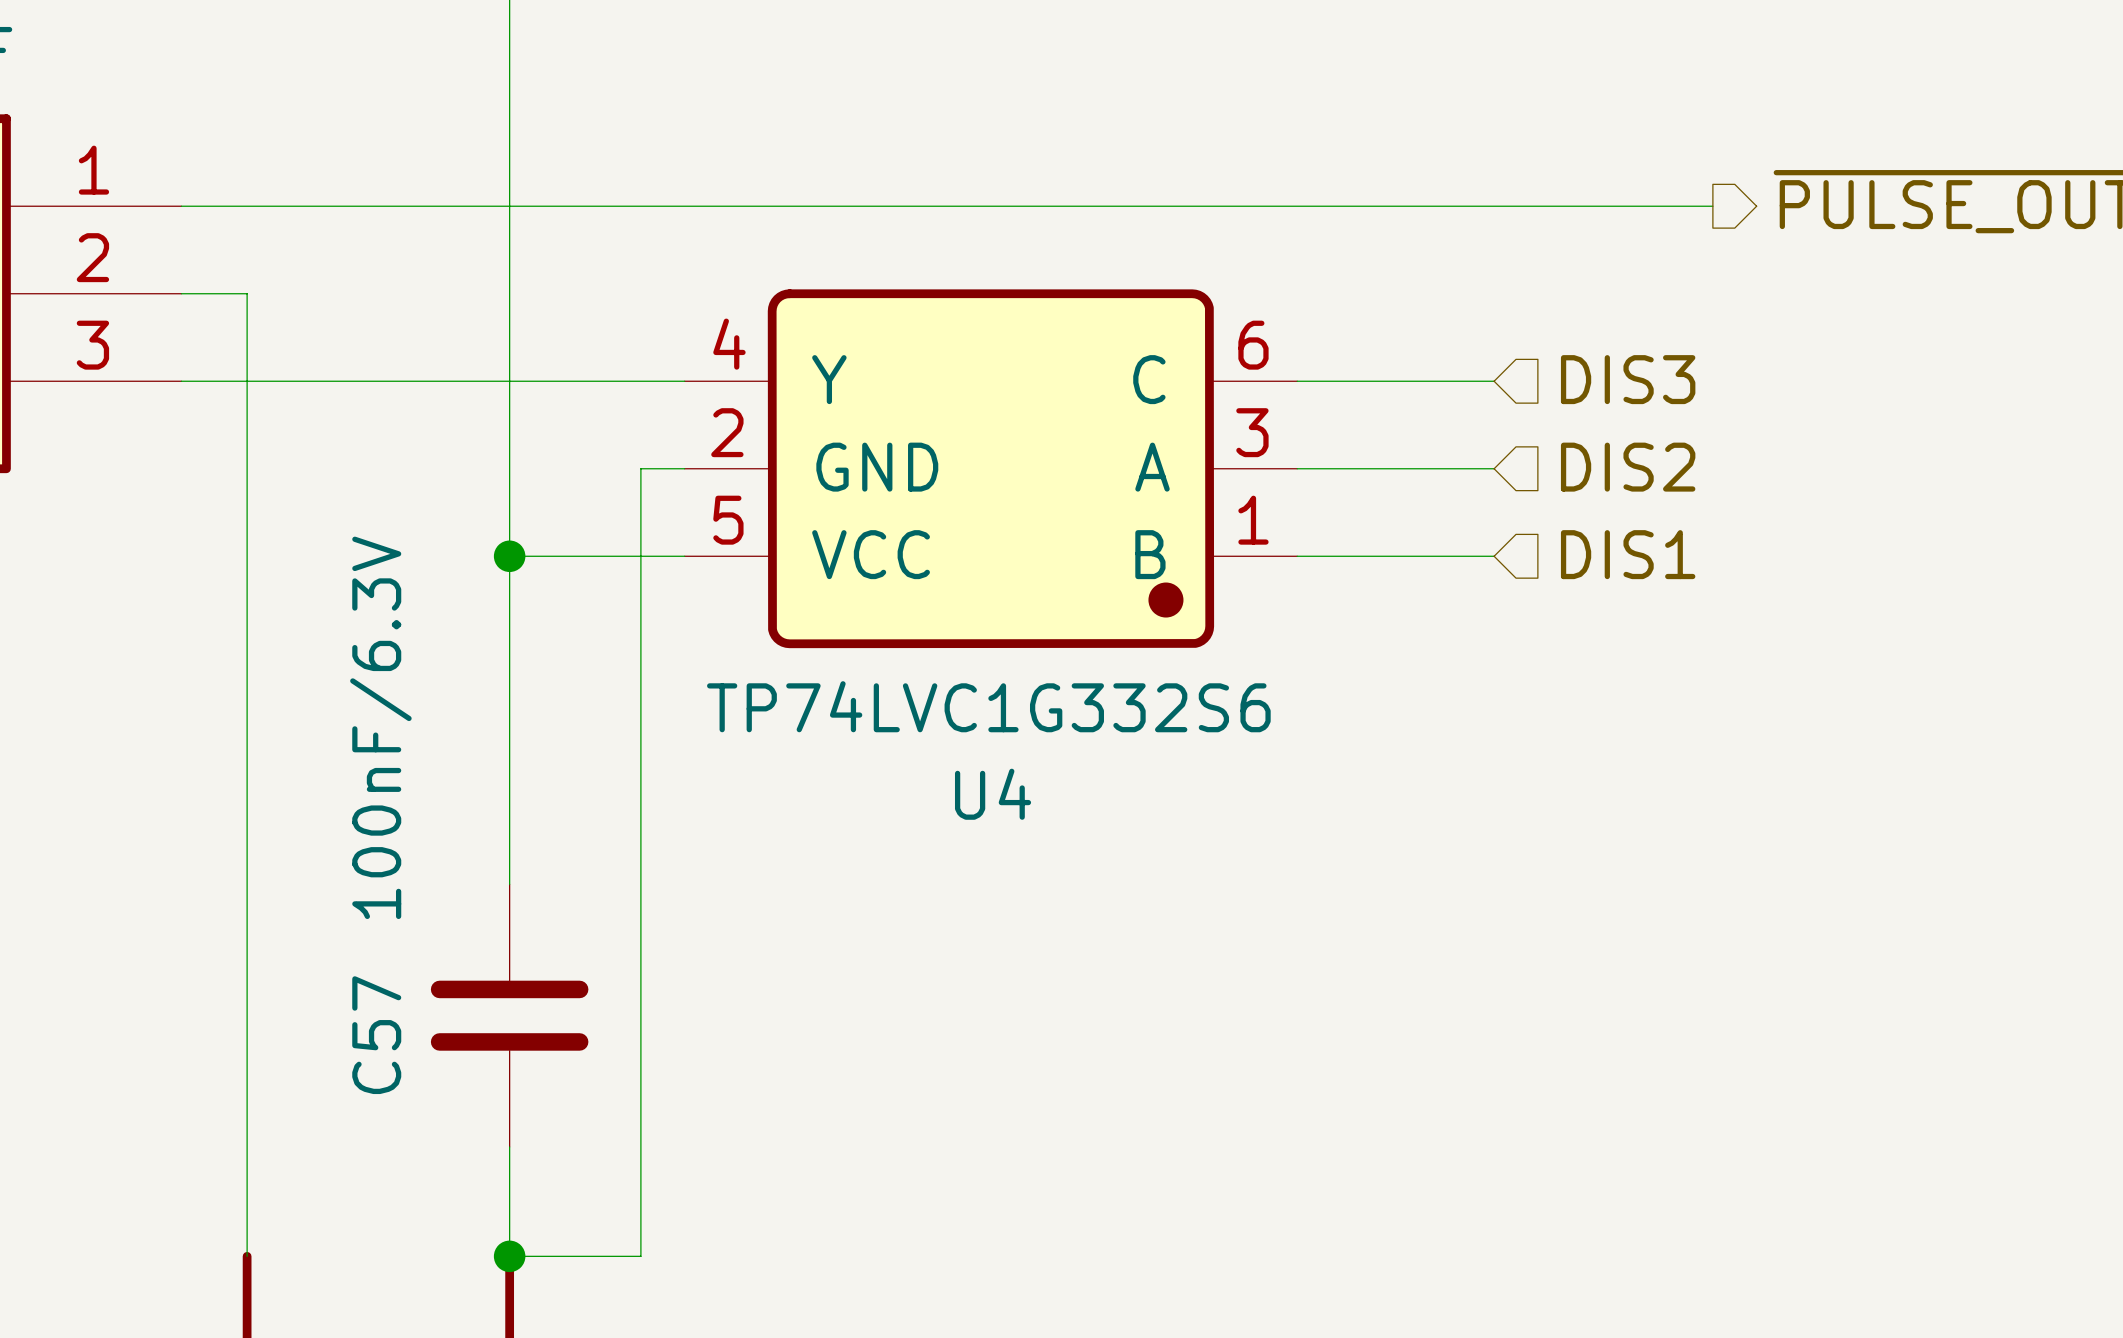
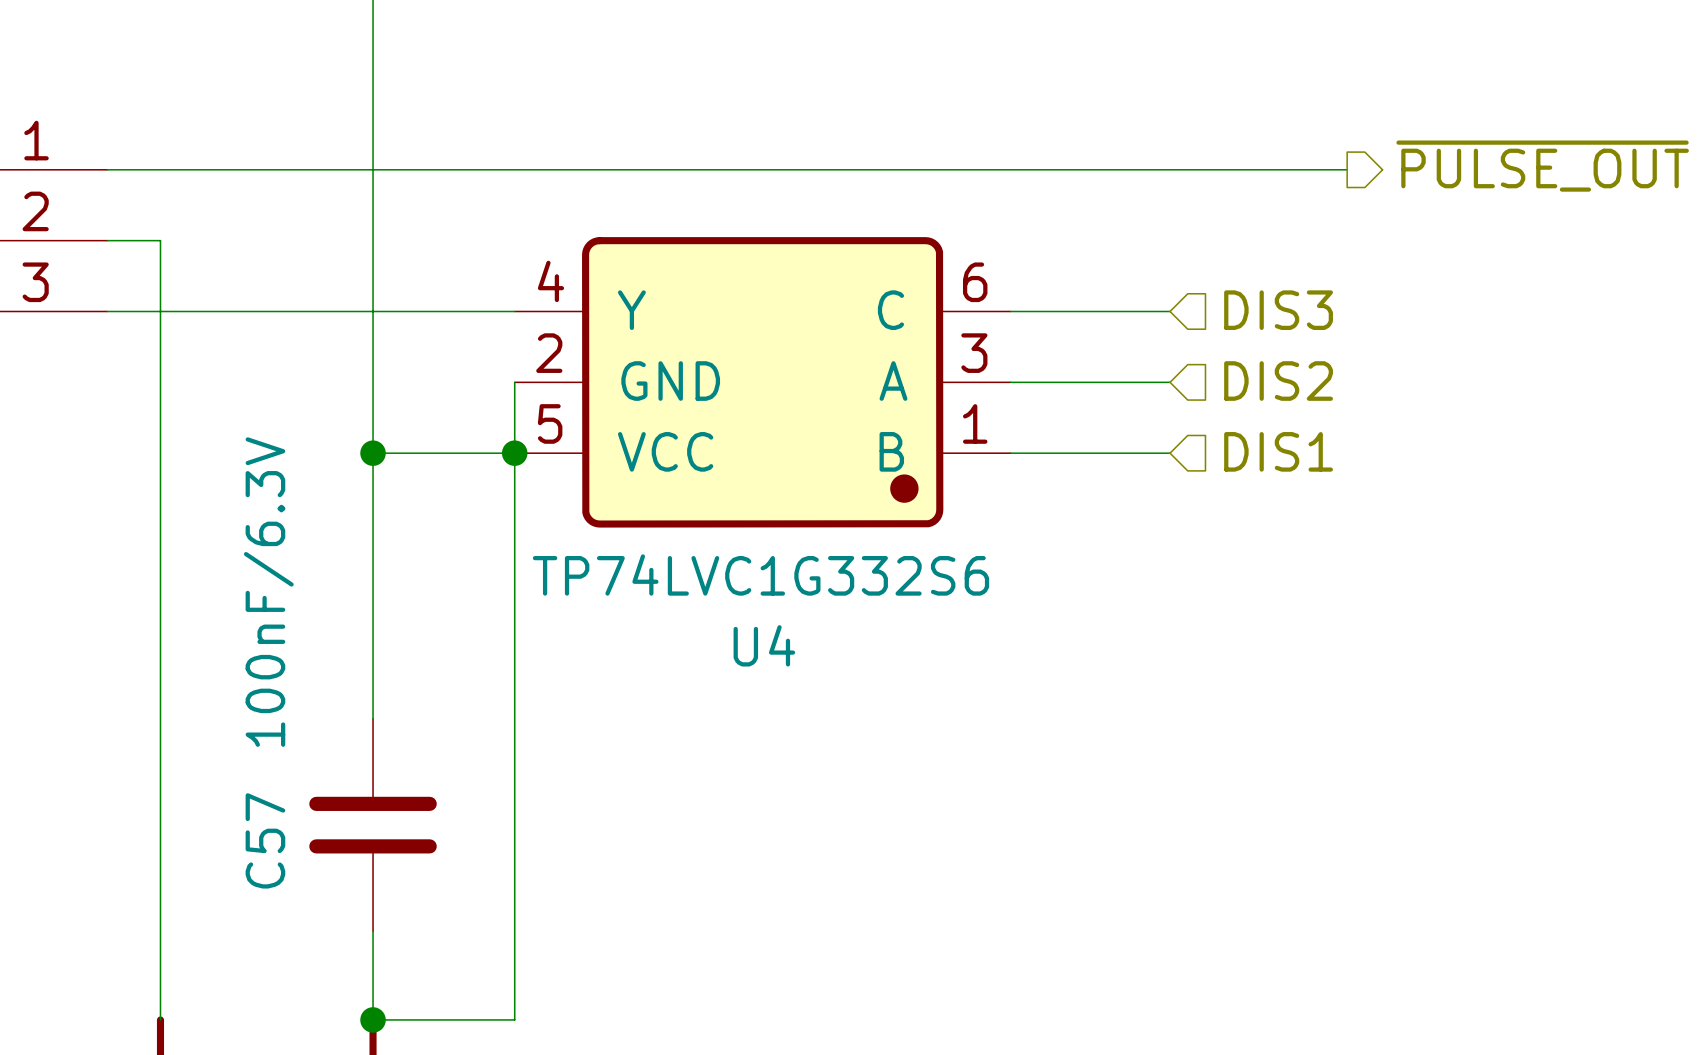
wire: (684, 468) (640, 468) (640, 1256) -> (514, 382) (514, 1019) (479, 1019)
junction: none -> (514, 453)

